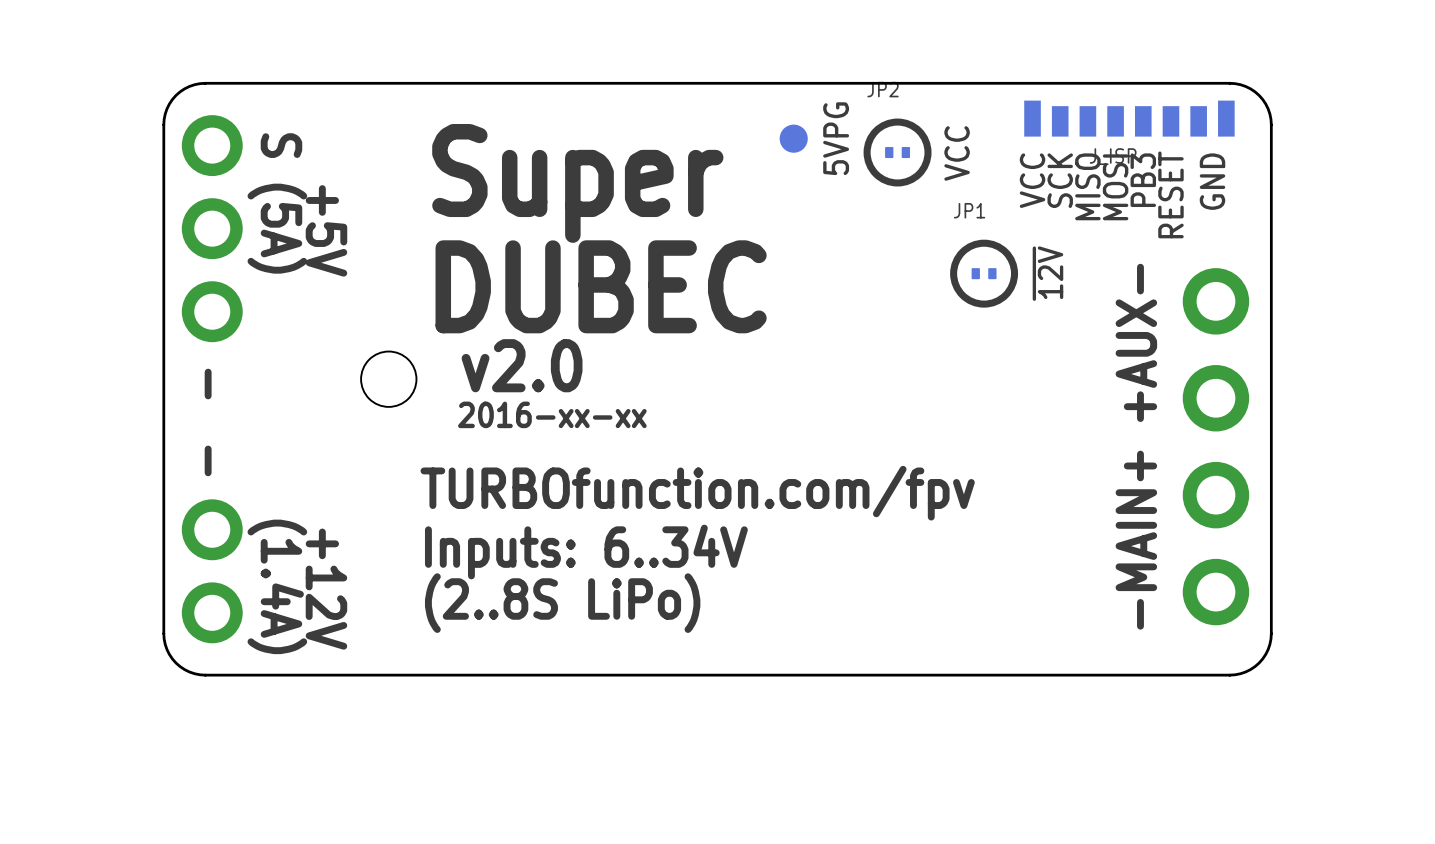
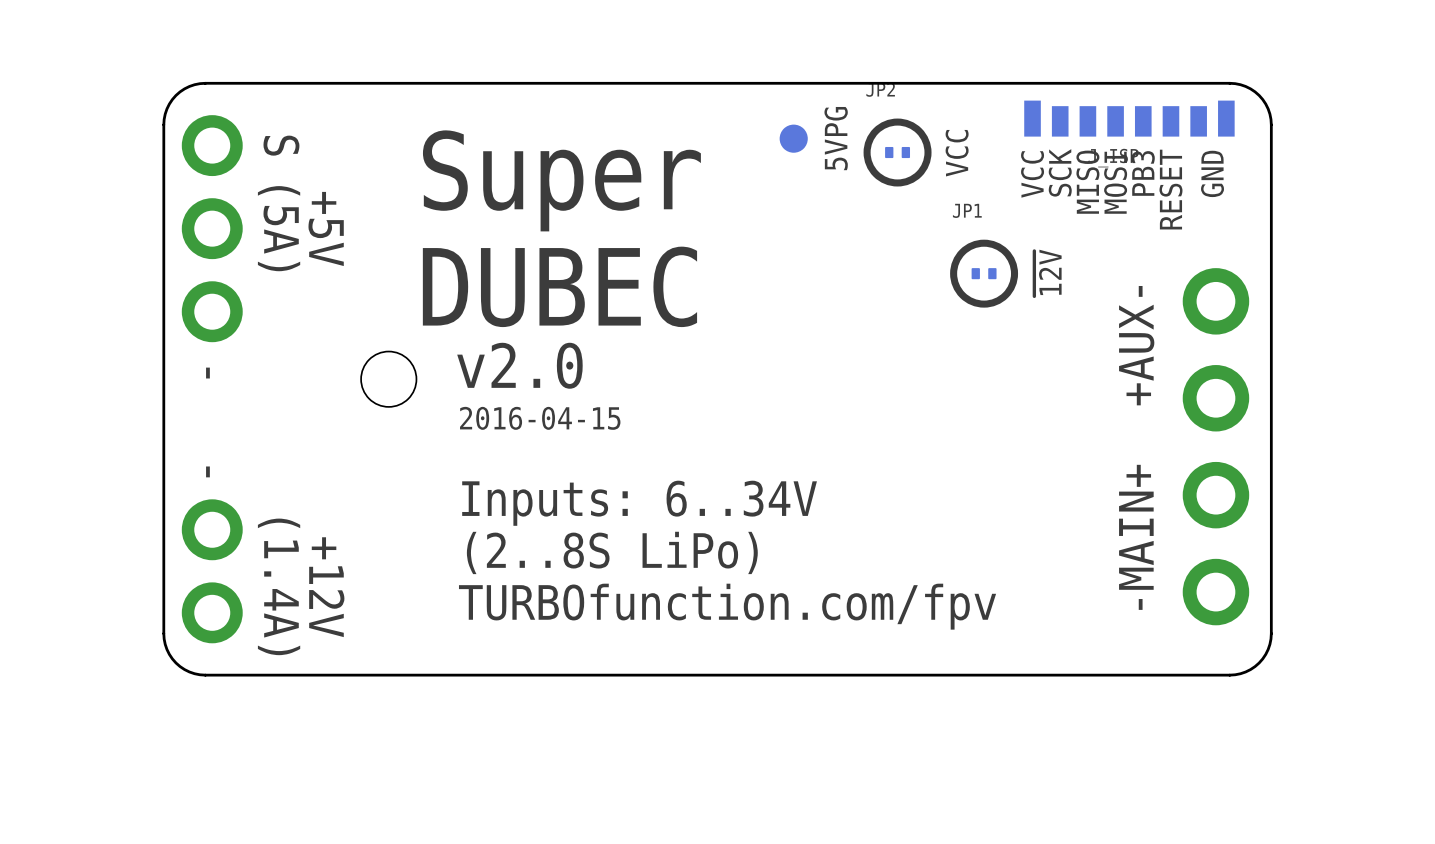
text: 2016-xx-xx (552, 414) -> 2016-04-15 (540, 418)
text position: TURBOfunction.com/fpv (697, 493) -> TURBOfunction.com/fpv (727, 606)
text position: Inputs: 6..34V (586, 552) -> Inputs: 6..34V (639, 503)
text position: (2..8S LiPo) (562, 603) -> (2..8S LiPo) (612, 552)

